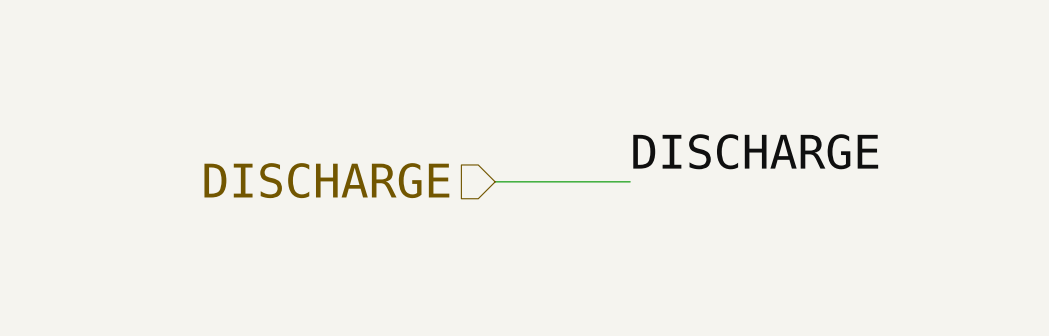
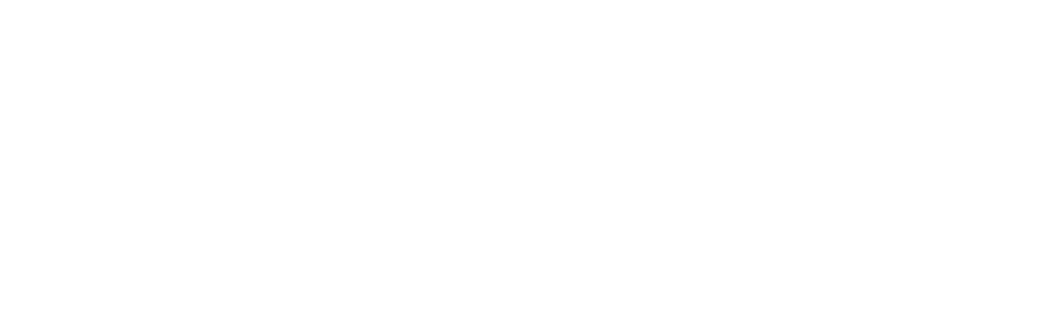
label: DISCHARGE (755, 151) -> none
hierarchical label: DISCHARGE (326, 180) -> none
wire: (495, 181) (630, 181) -> none

